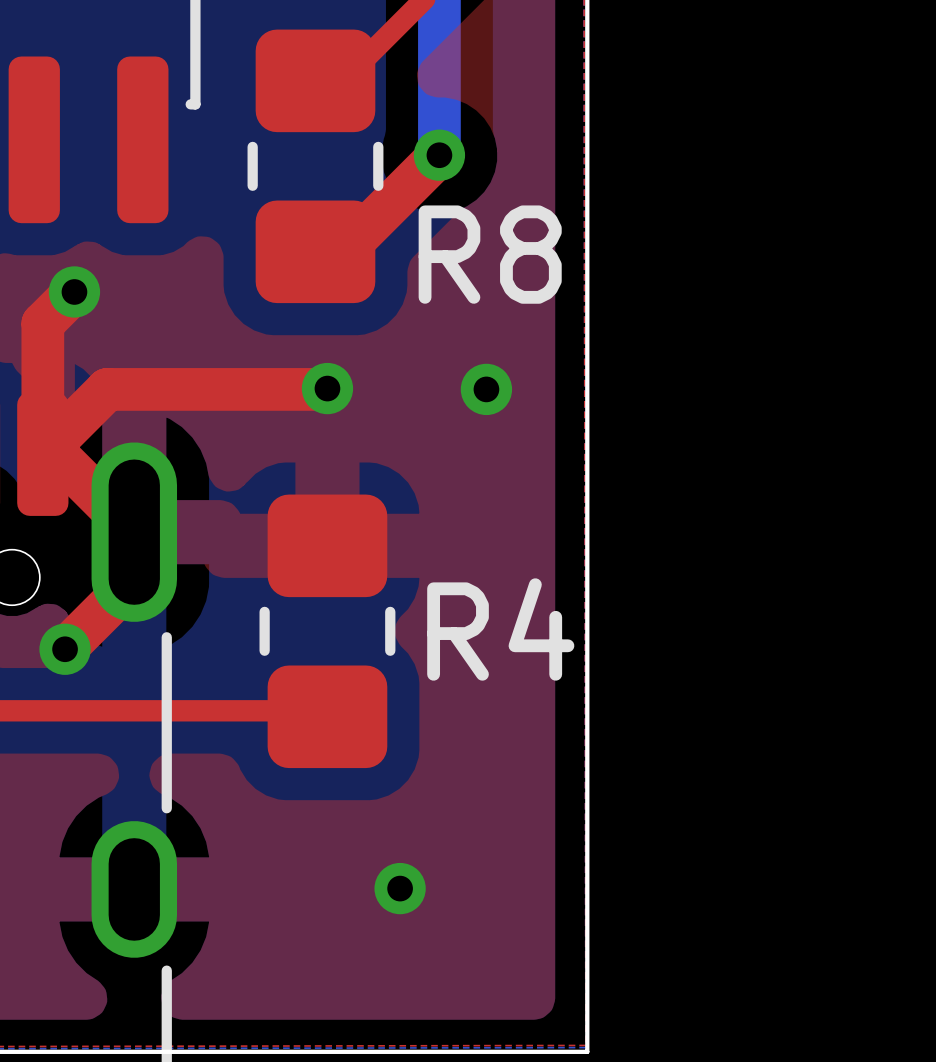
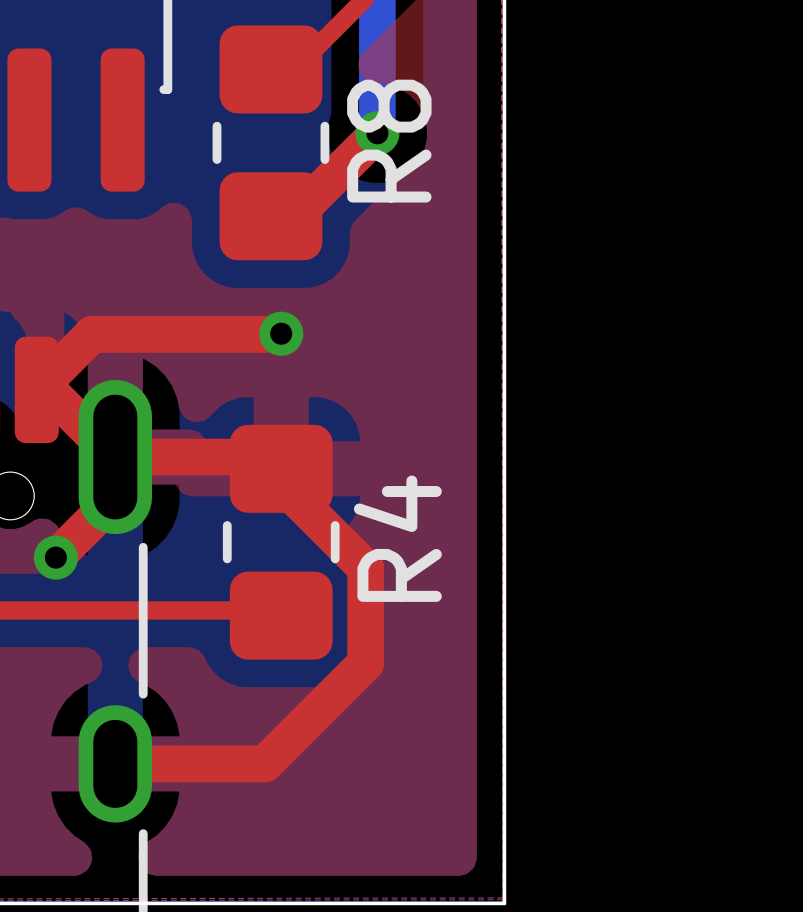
R8 name rotation: 0° (490, 254) -> 90° counterclockwise (389, 141)
top track: (74, 291) (42, 323) (42, 453) -> none
via: (74, 291) -> none
via: (486, 389) -> none
top track: none -> (115, 498) (115, 457) (254, 457) (365, 568) (365, 663) (264, 763) (115, 763)
R4 name rotation: 0° (500, 629) -> 90° counterclockwise (397, 538)
via: (400, 888) -> none

